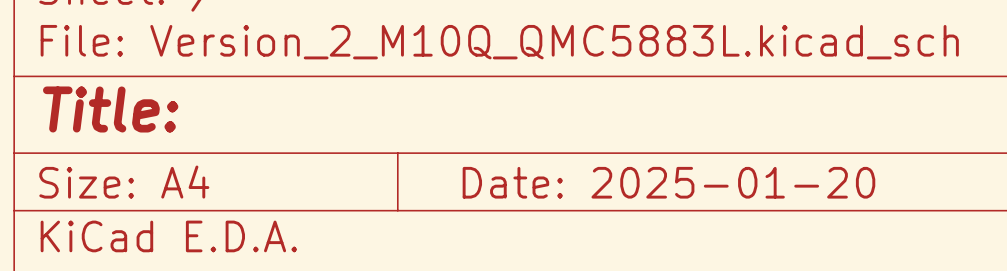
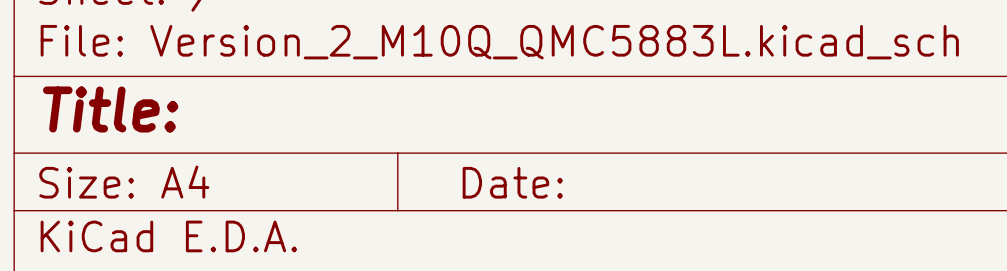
title block: Date: 2025-01-20 (668, 182) -> Date: (512, 182)

